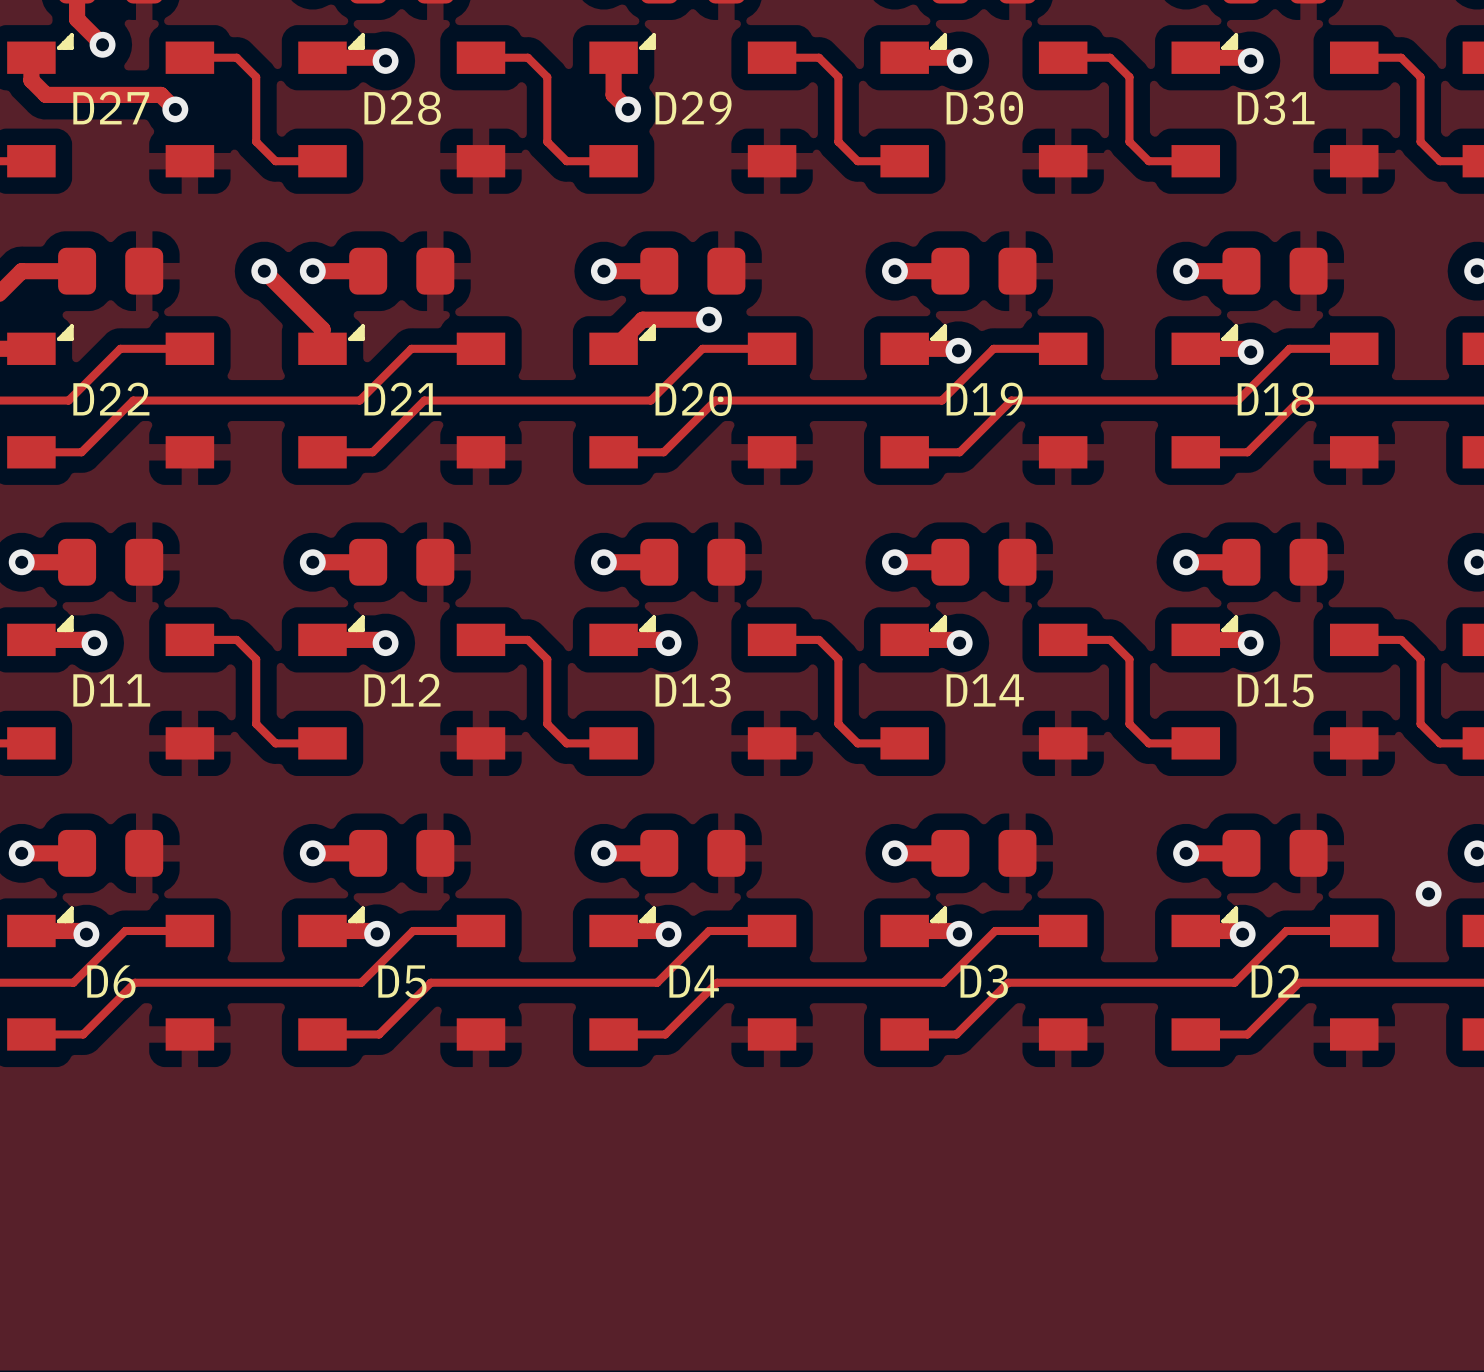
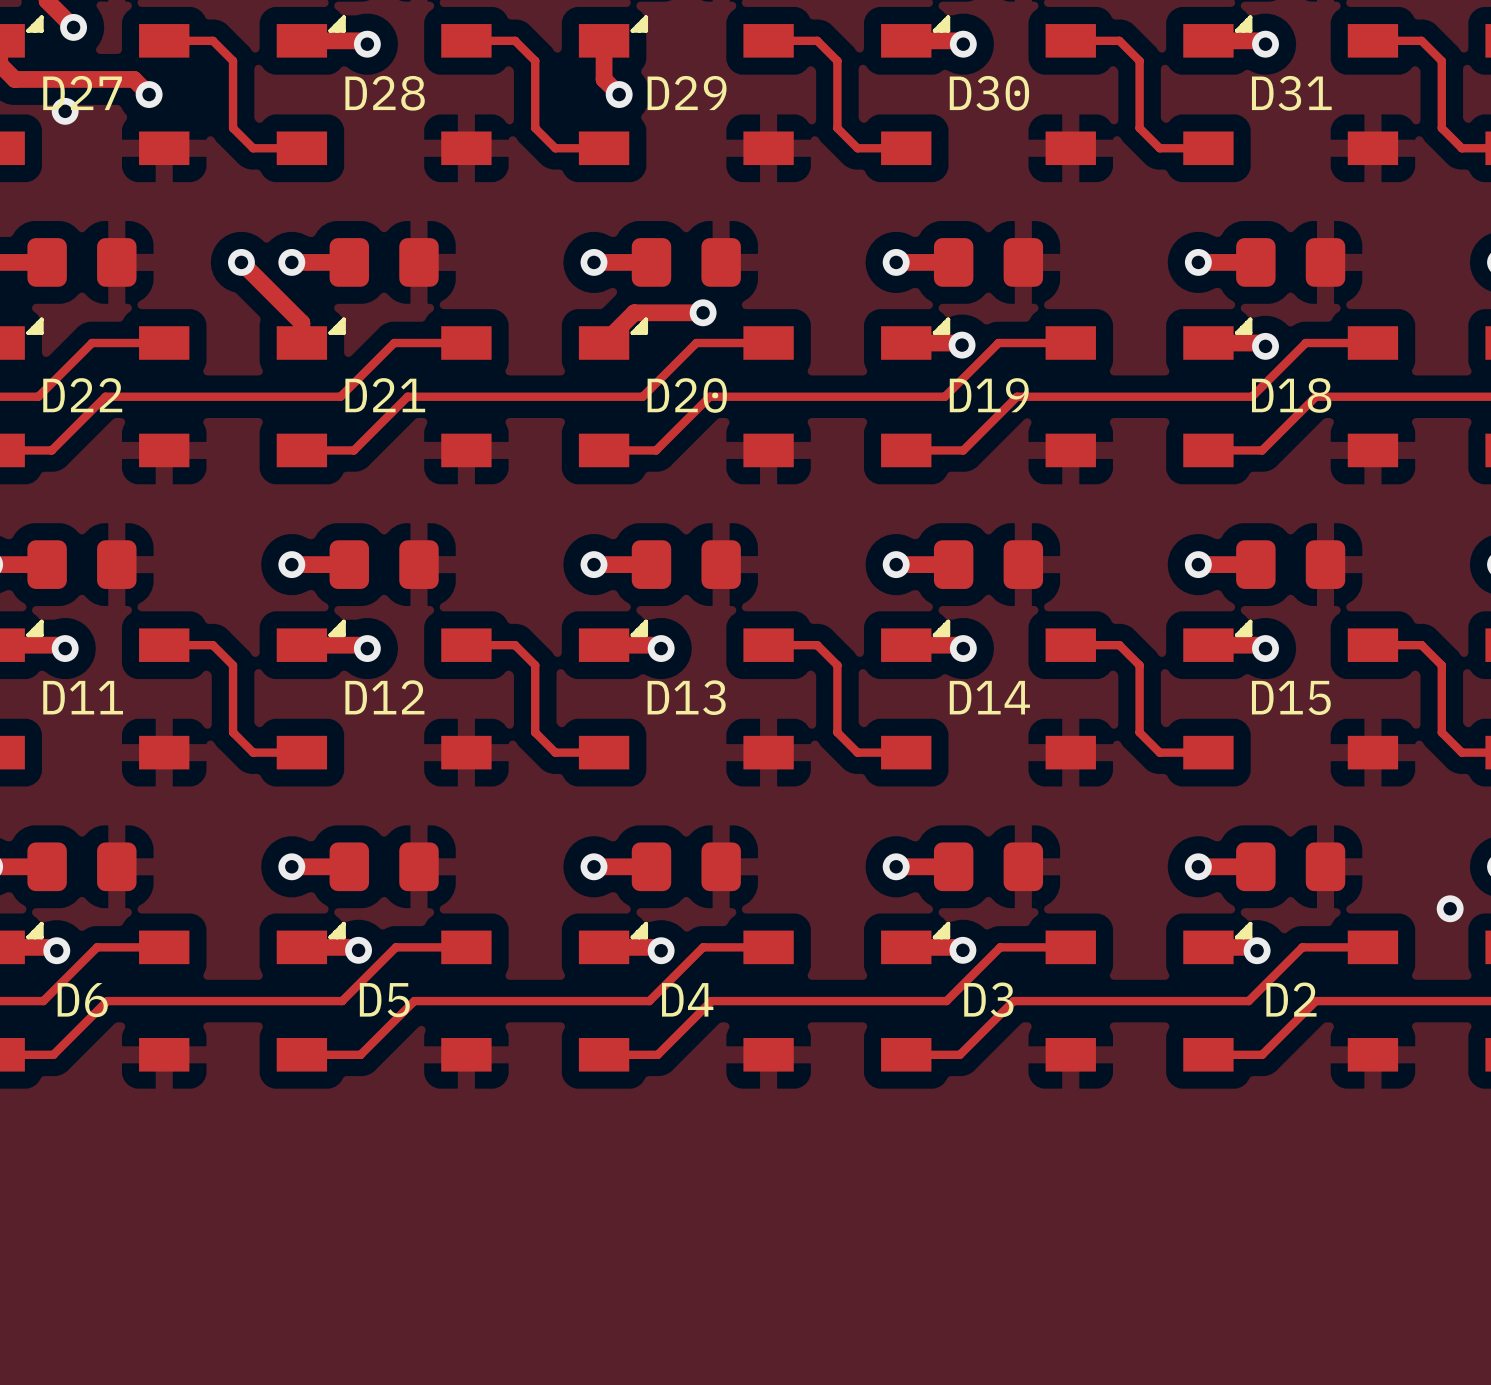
via: none -> (65, 111)

